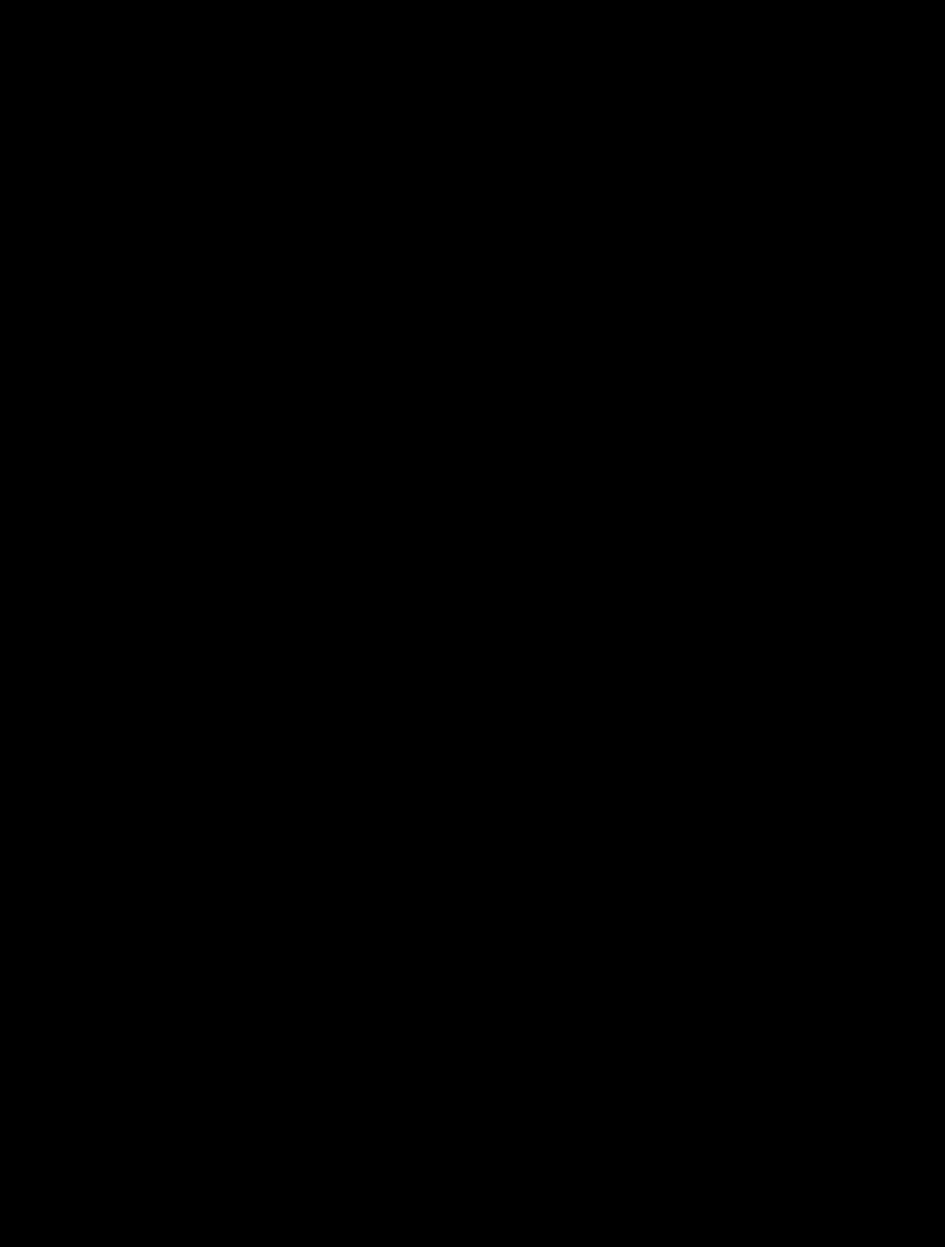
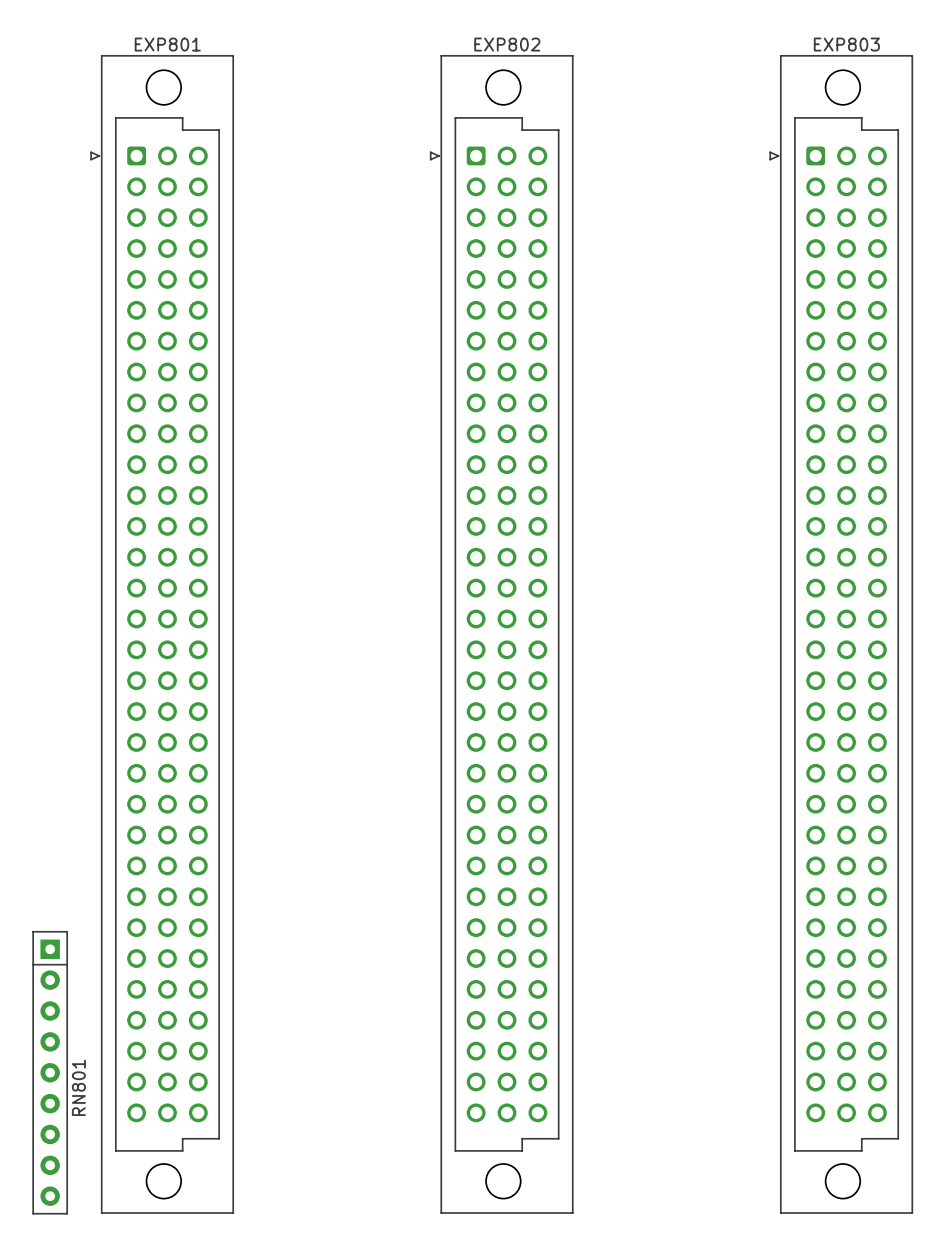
EXP801: none -> (162, 634)
EXP802: none -> (501, 634)
EXP803: none -> (841, 634)
RN801: none -> (50, 1072)

